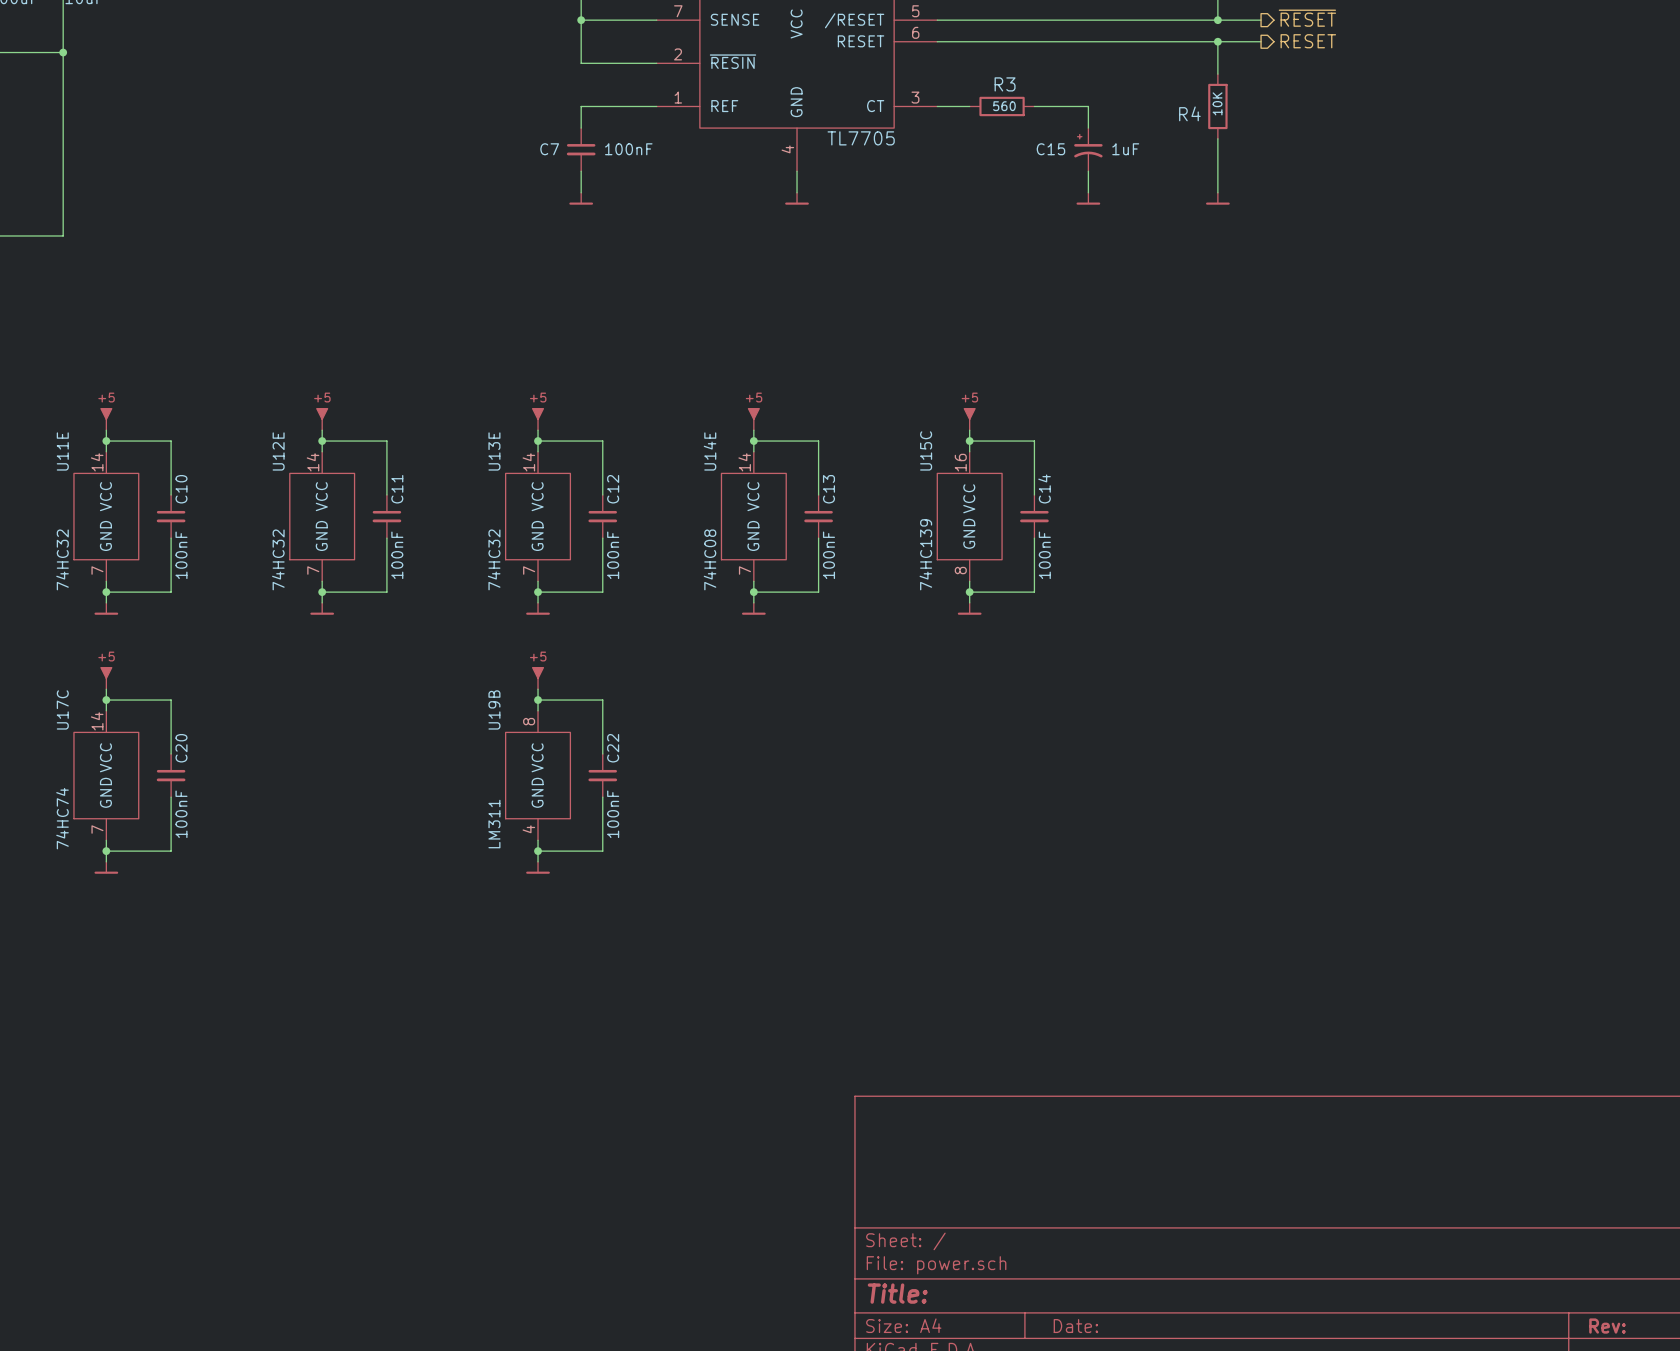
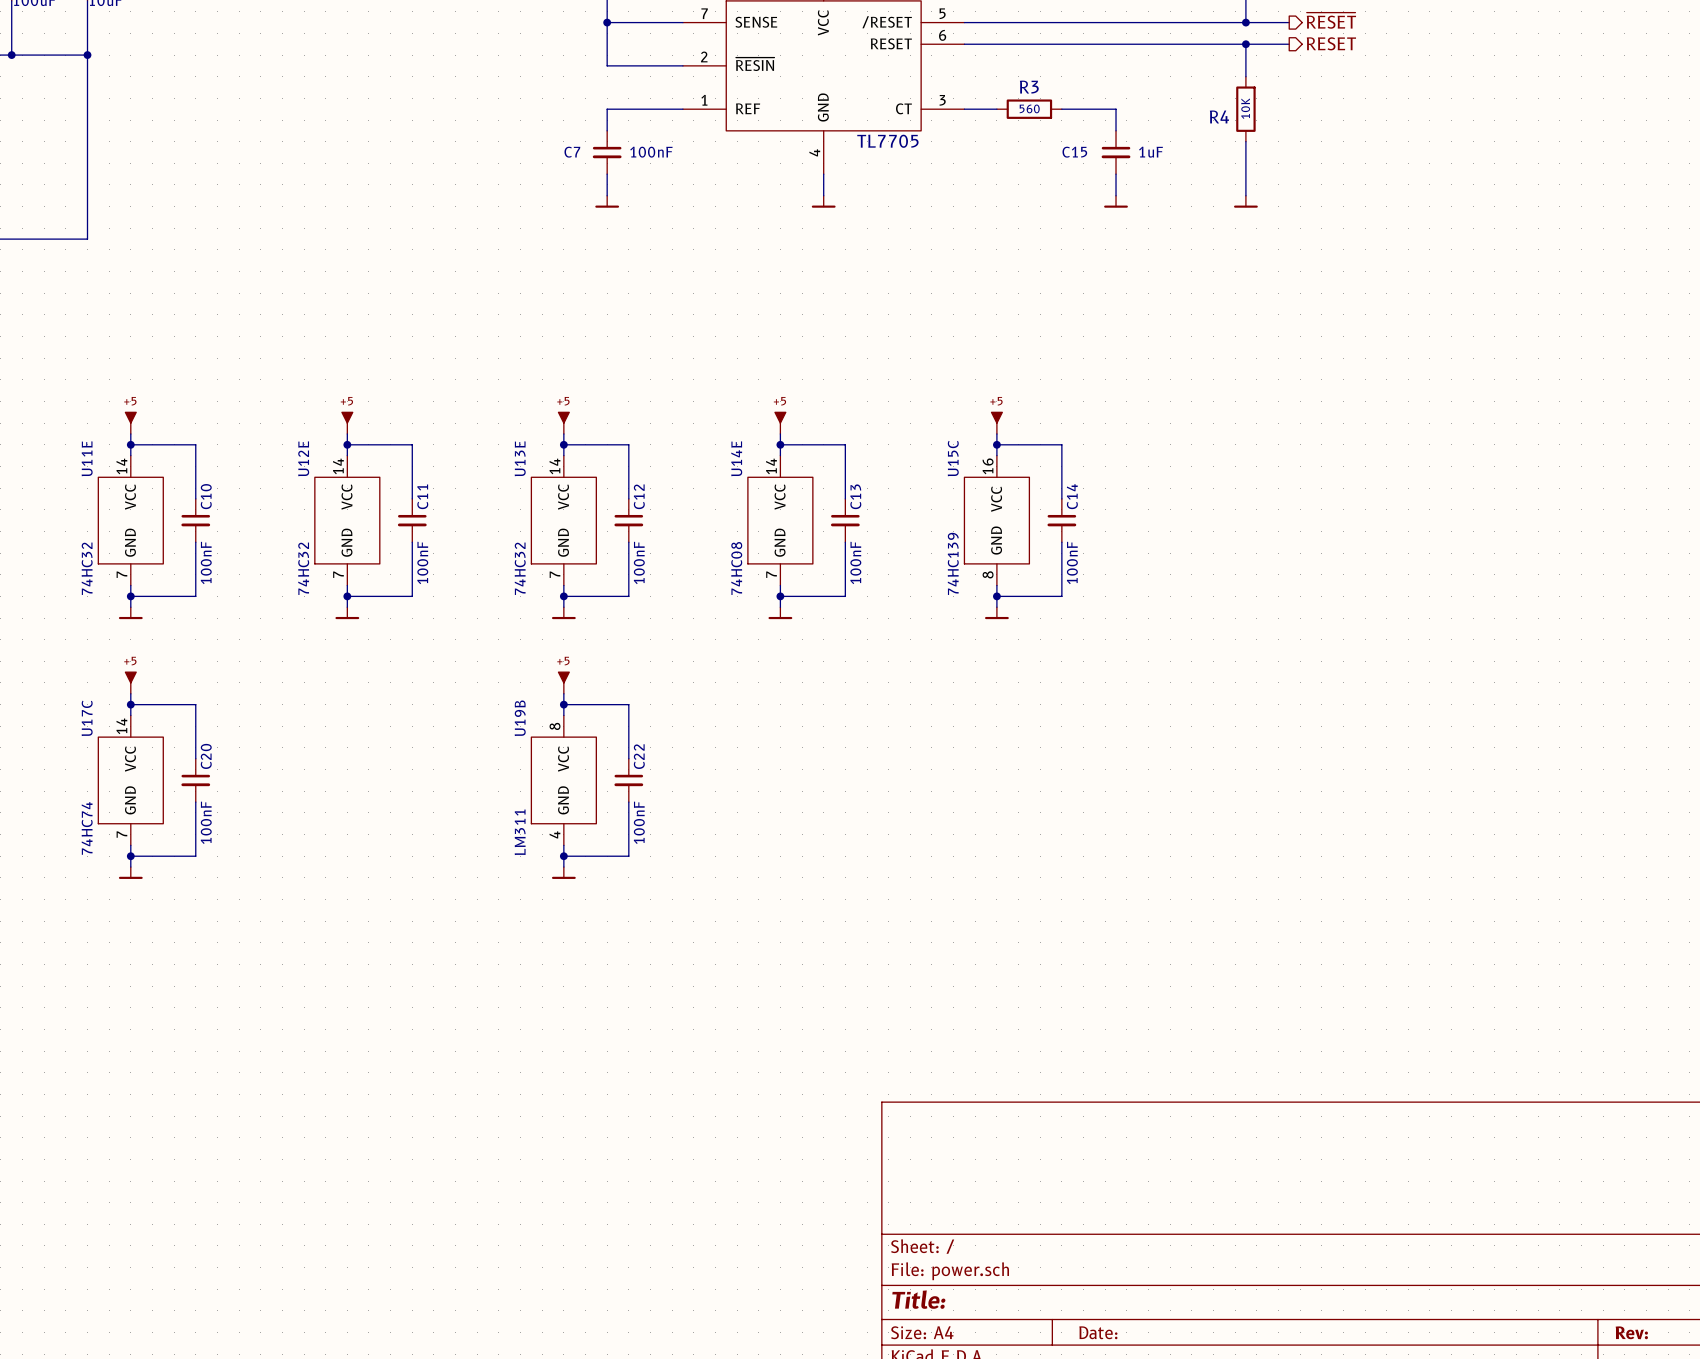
C15 symbol: [1074, 128, 1103, 172] -> [1101, 130, 1131, 175]

